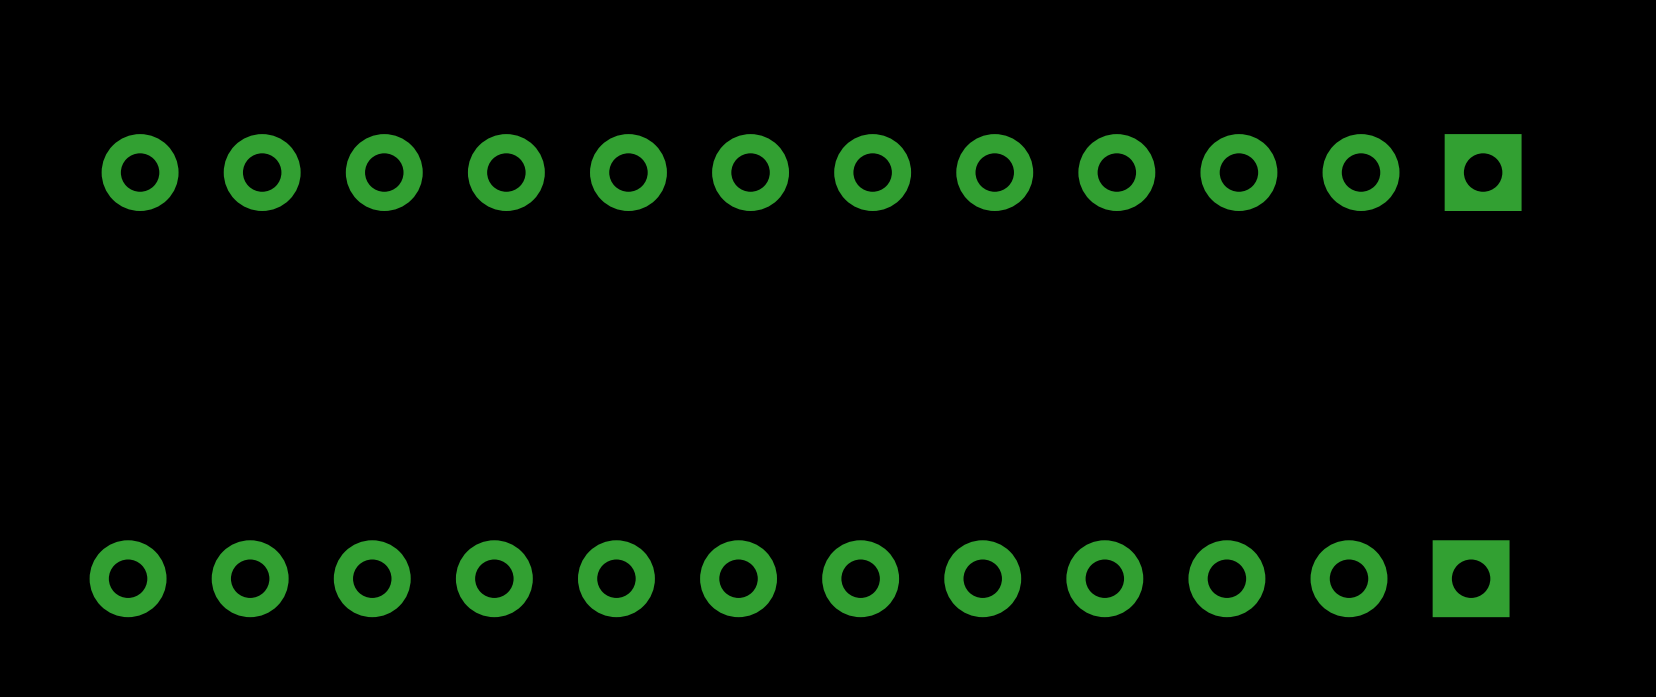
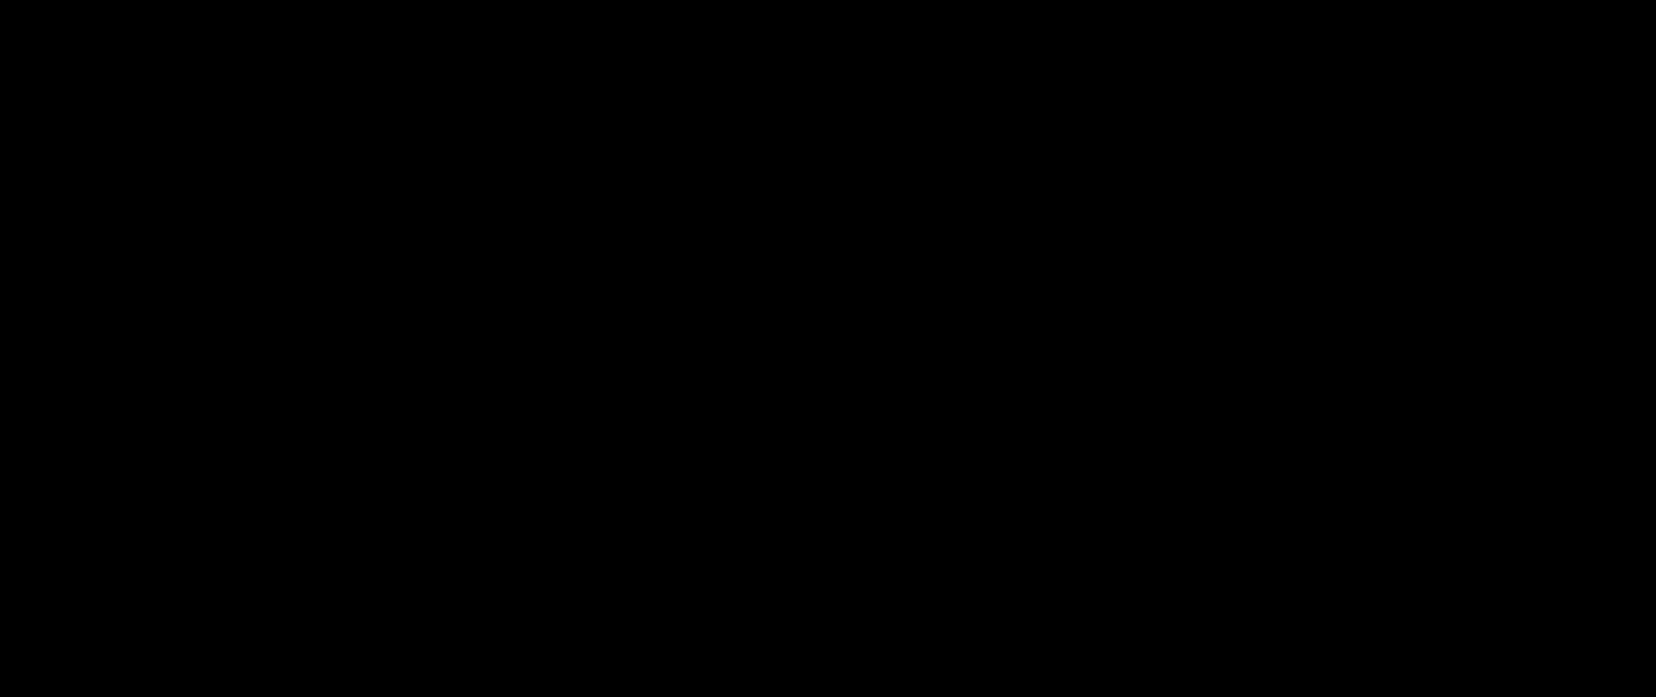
part: (811, 172) -> none
part: (799, 578) -> none

